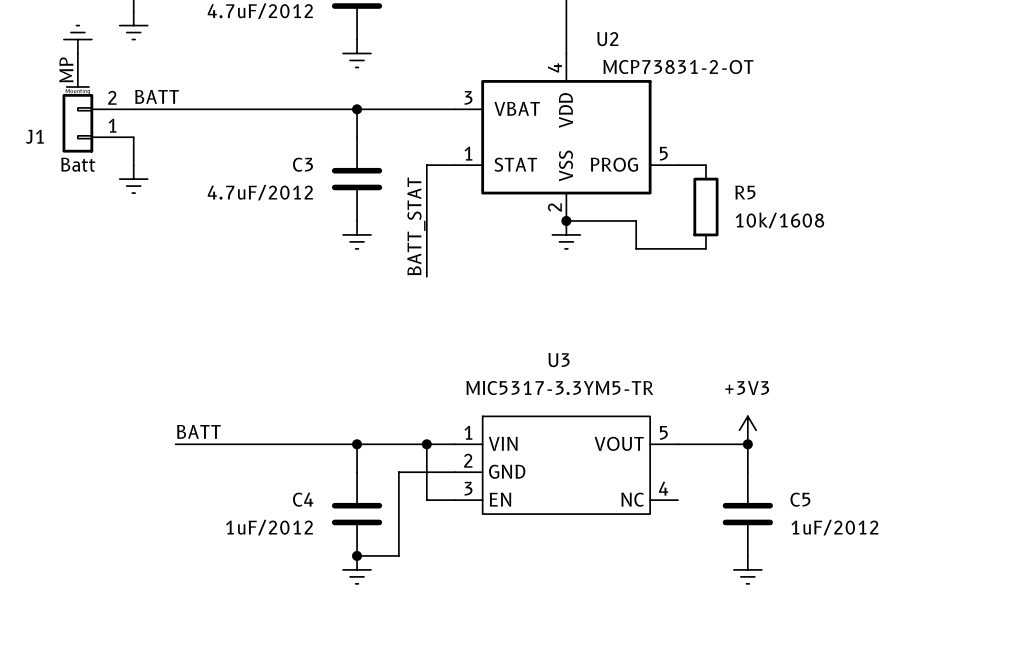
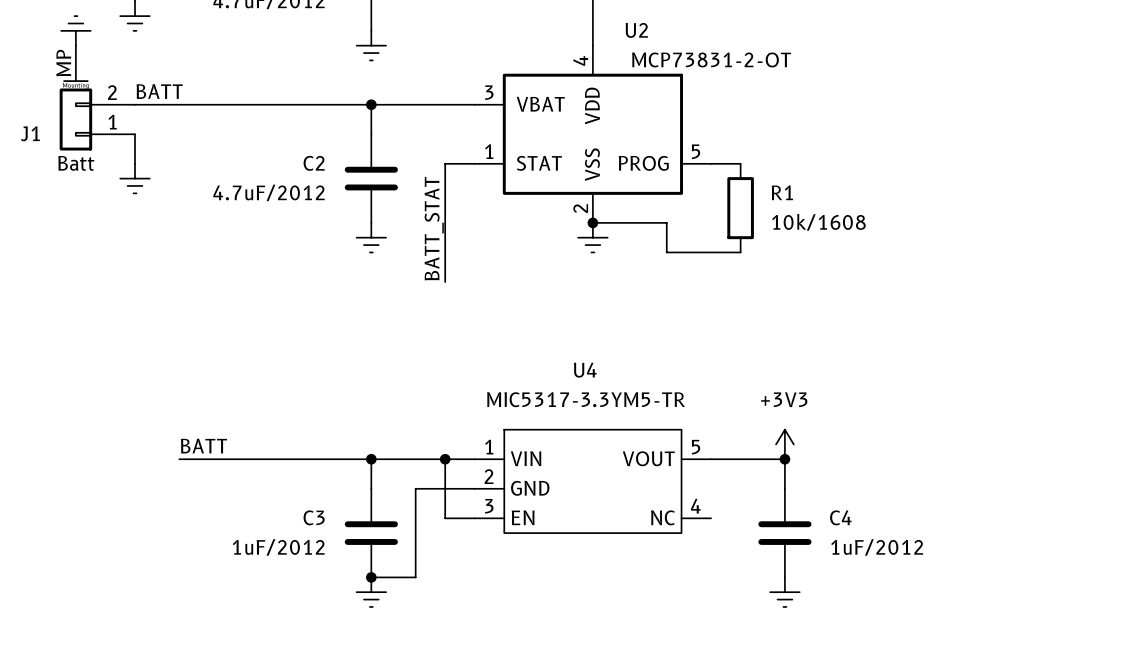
C3 name: C3 (302, 164) -> C2 (314, 163)
R5 name: R5 (745, 192) -> R1 (782, 192)
U3 name: U3 (558, 360) -> U4 (585, 370)
C4 name: C4 (303, 499) -> C3 (314, 517)
C5 name: C5 (800, 499) -> C4 (840, 517)

